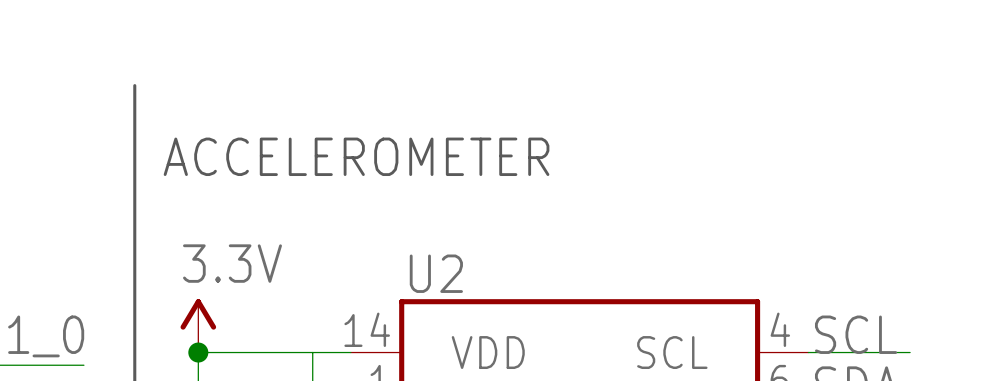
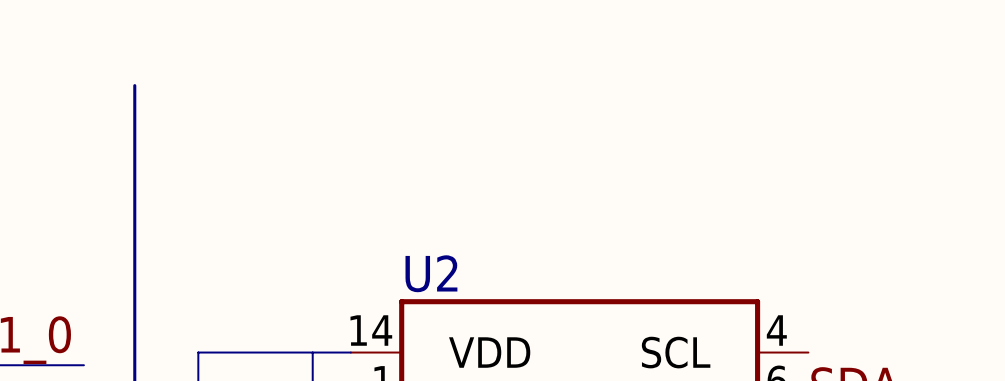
text: ACCELEROMETER (356, 156) -> none
power symbol: 3.3V (198, 325) -> none
label: SCL (856, 334) -> none
junction: (198, 352) -> none
wire: (808, 352) (910, 352) -> none

